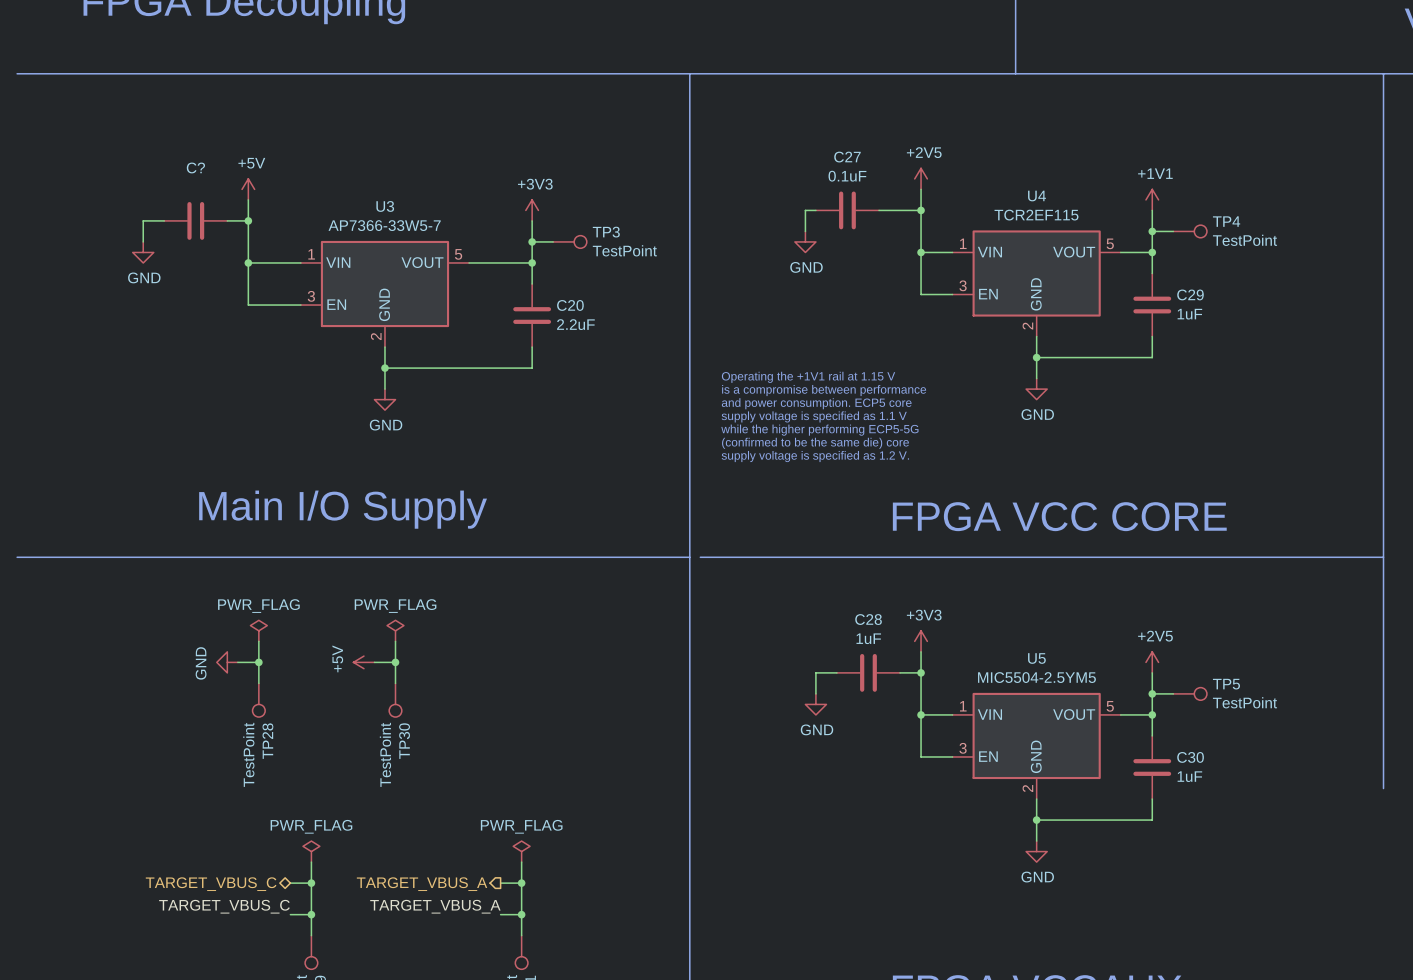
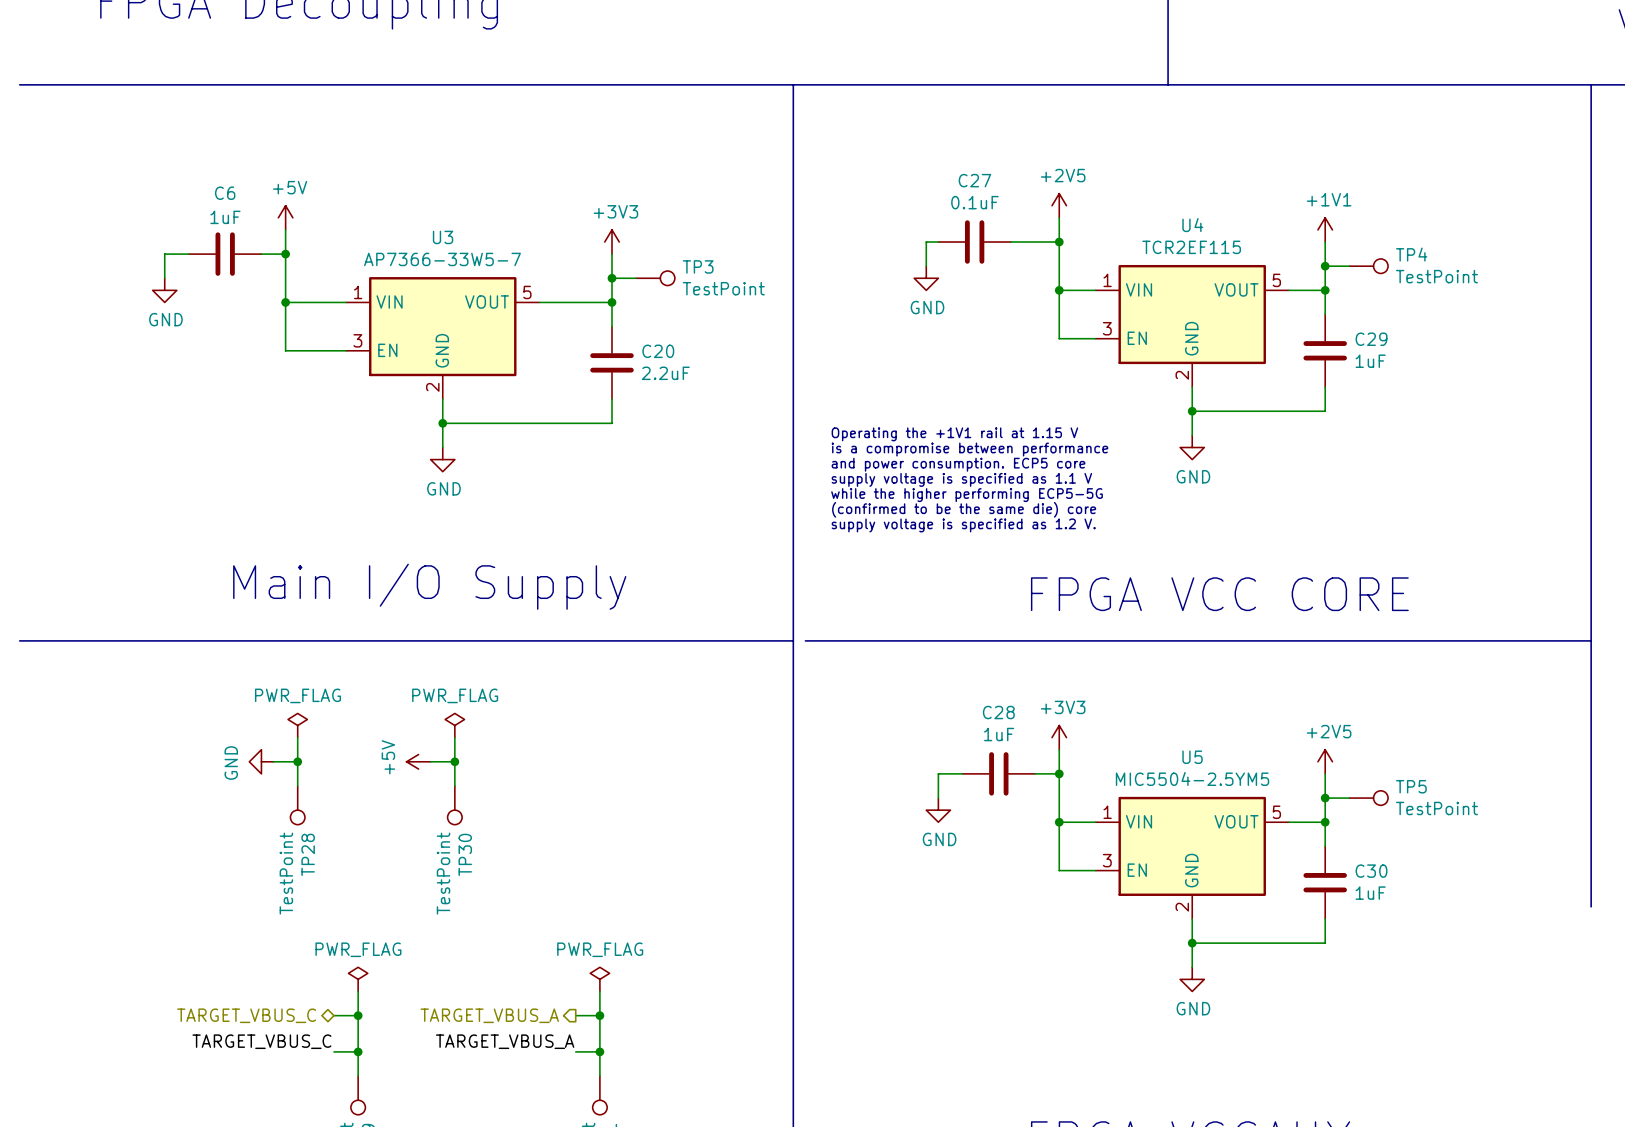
C? name: C? (195, 167) -> C6 (225, 193)
C? value: none -> 1uF (225, 217)

